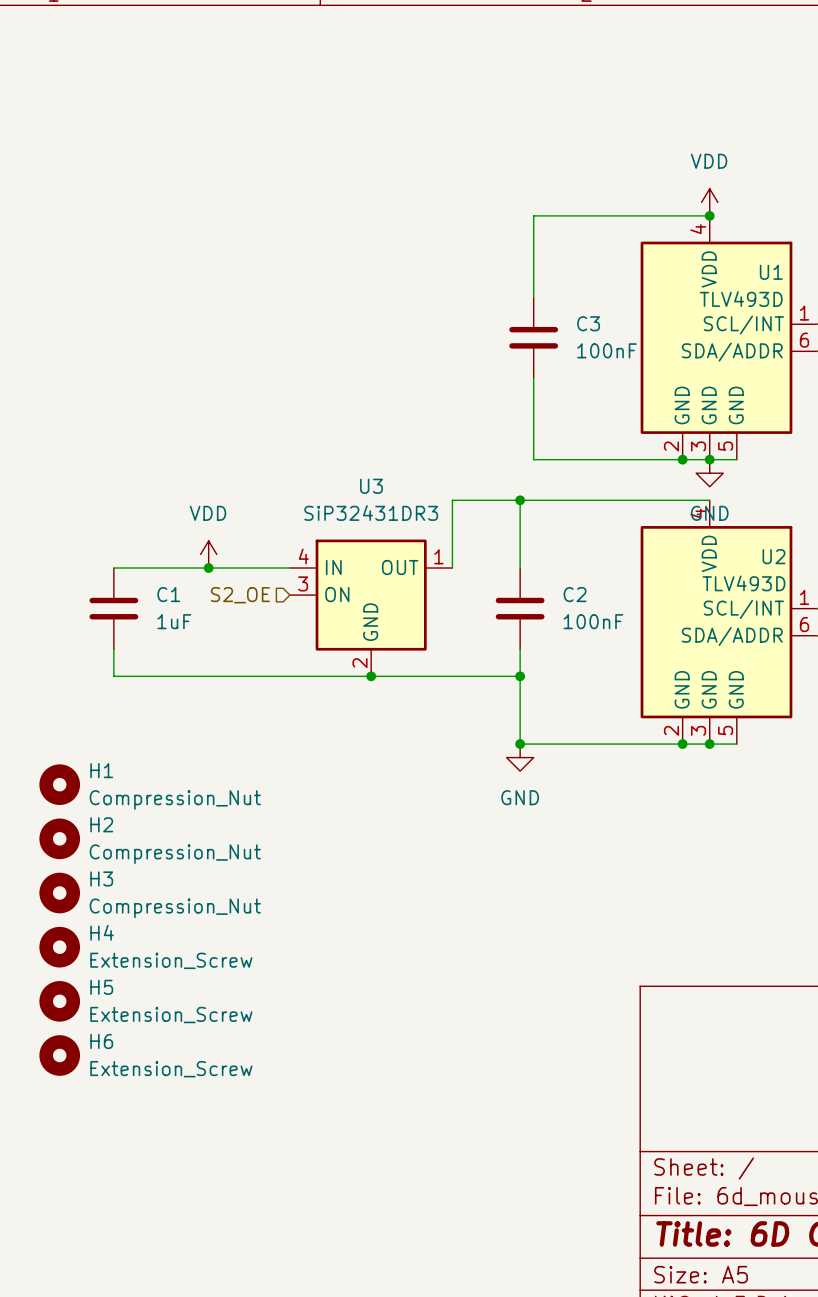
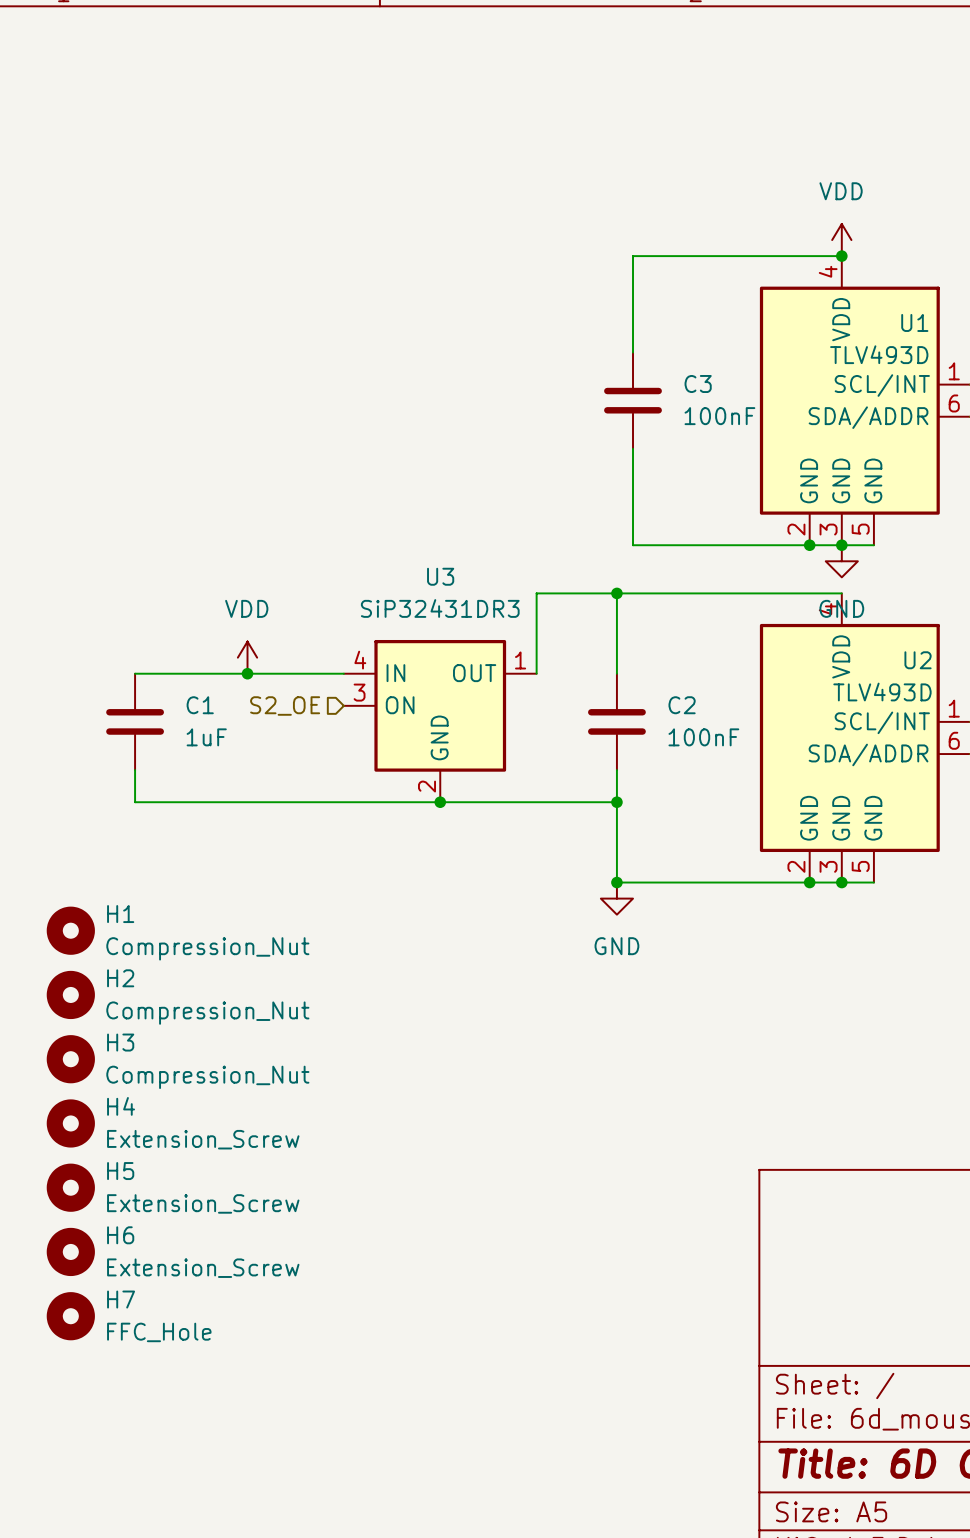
H7: none -> FFC_Hole (70, 1316)

